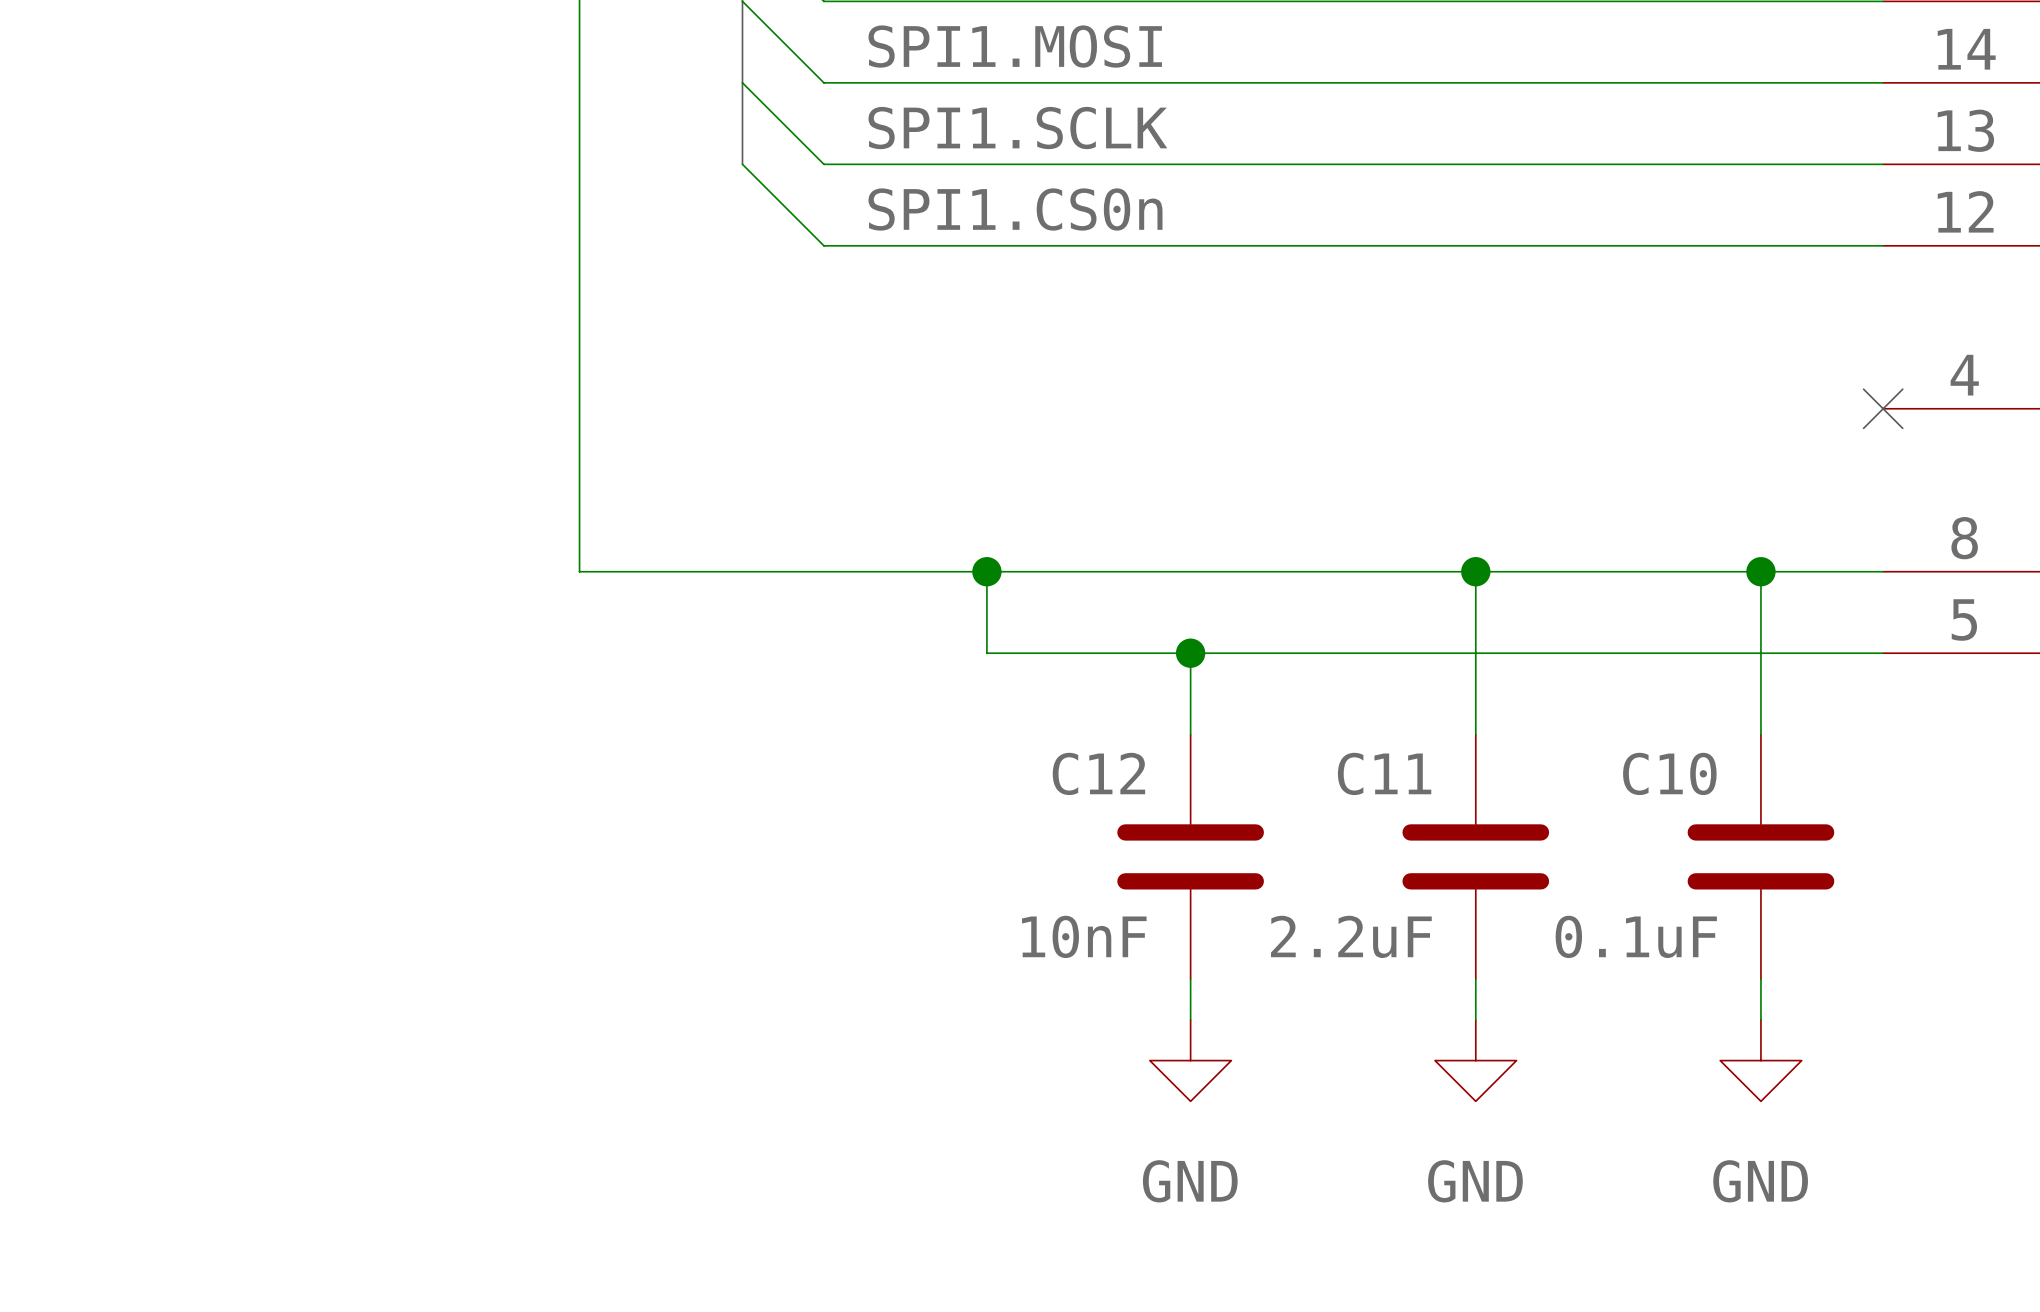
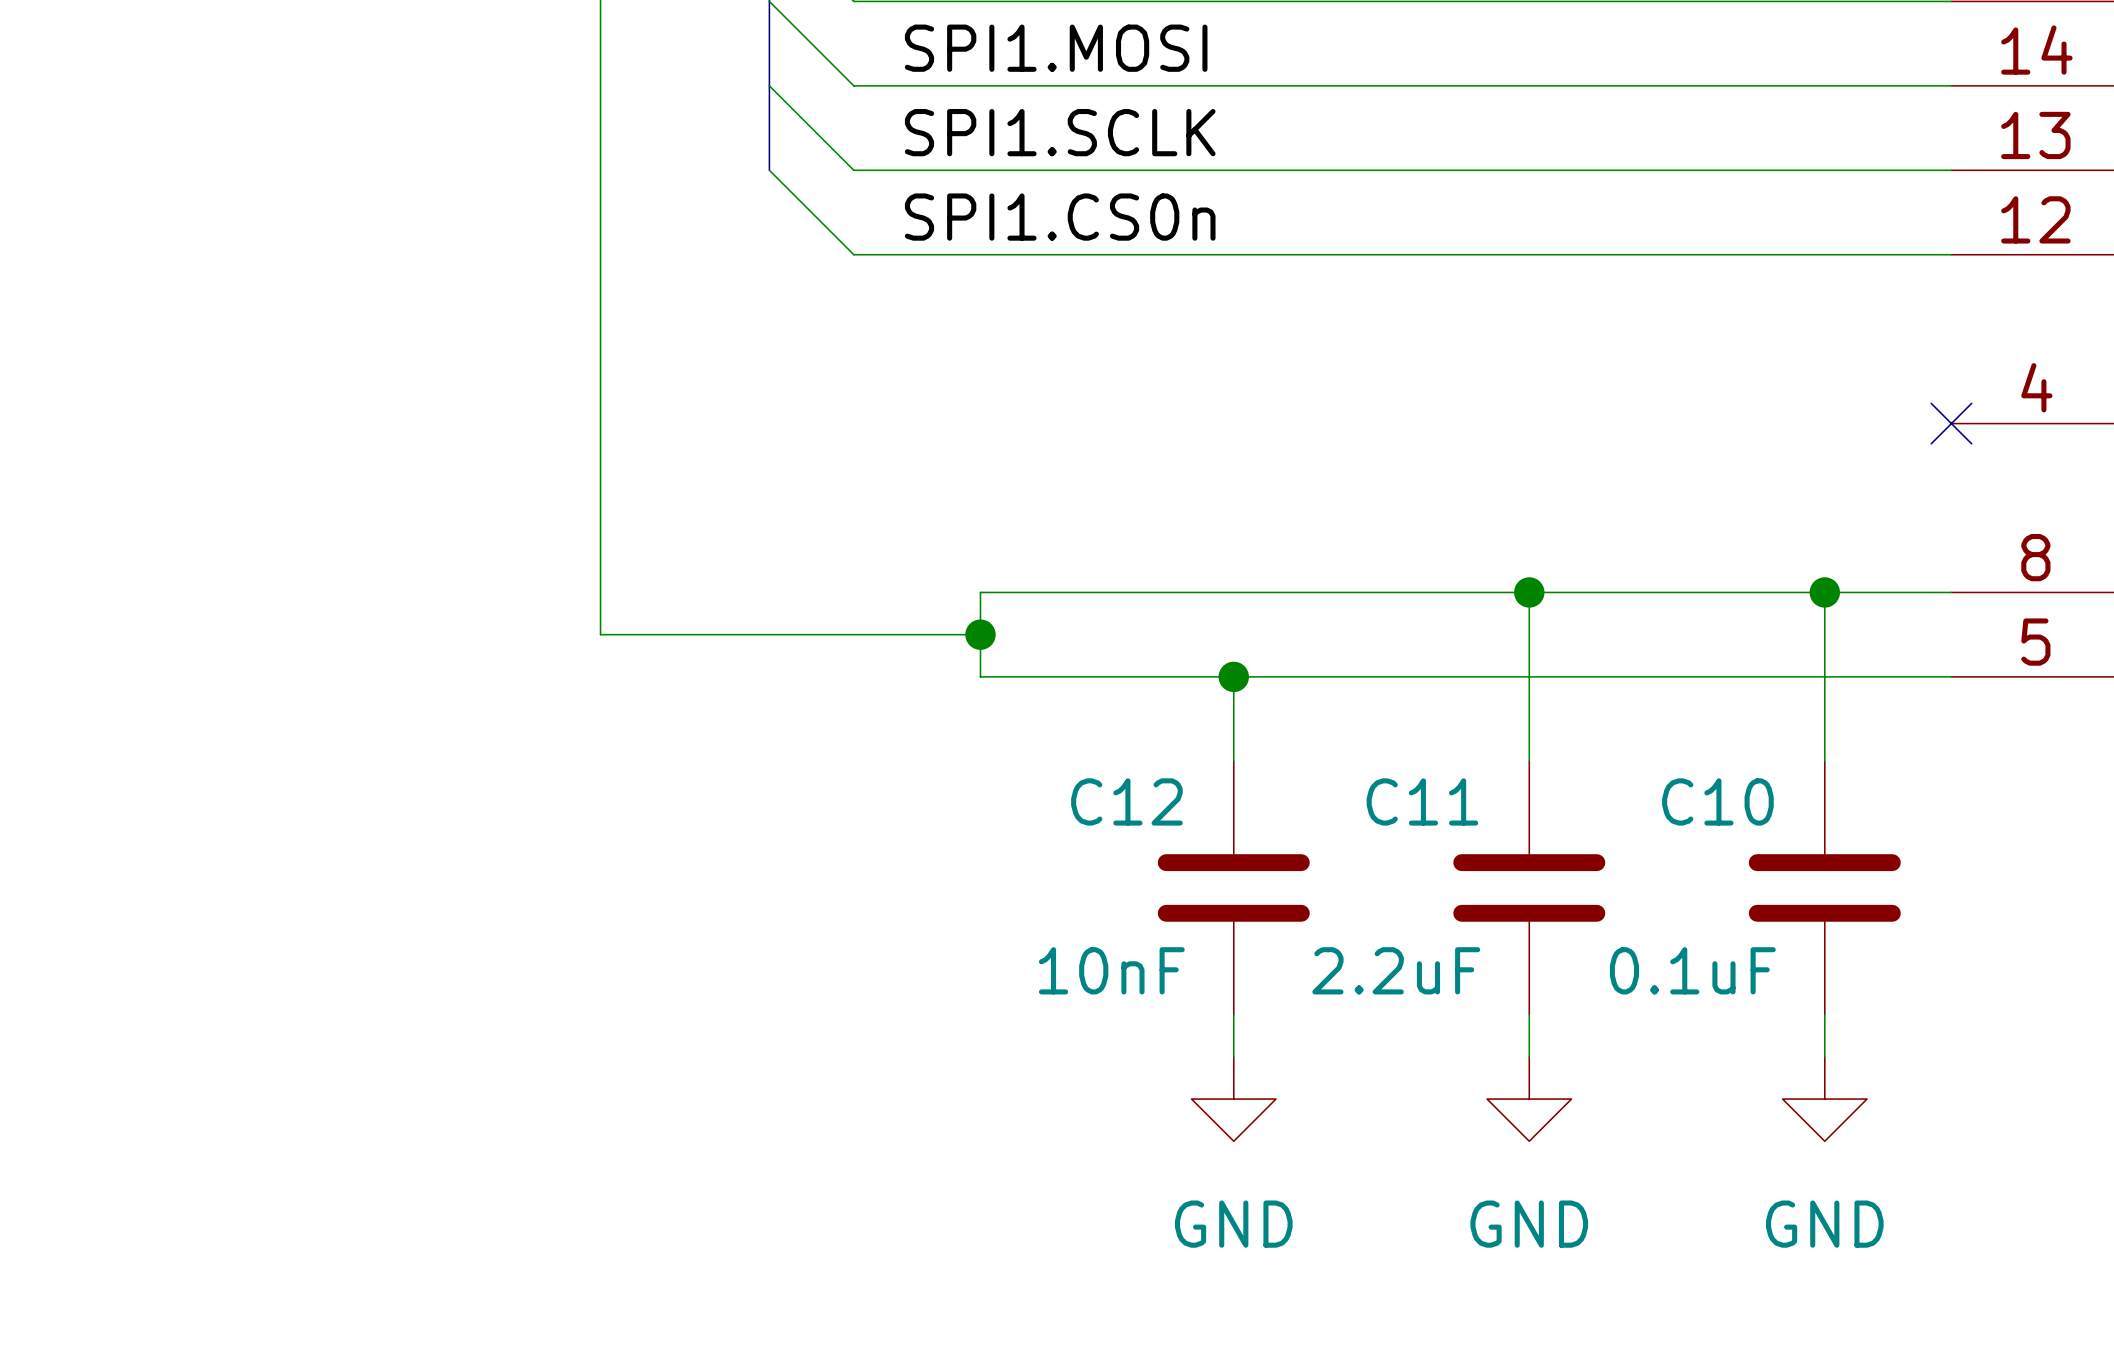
wire: (579, 571) (946, 571) -> (600, 592) (600, 634) (980, 634)
wire: (986, 571) (986, 653) -> (980, 592) (980, 676) (1022, 676)
junction position: (986, 571) -> (980, 634)

